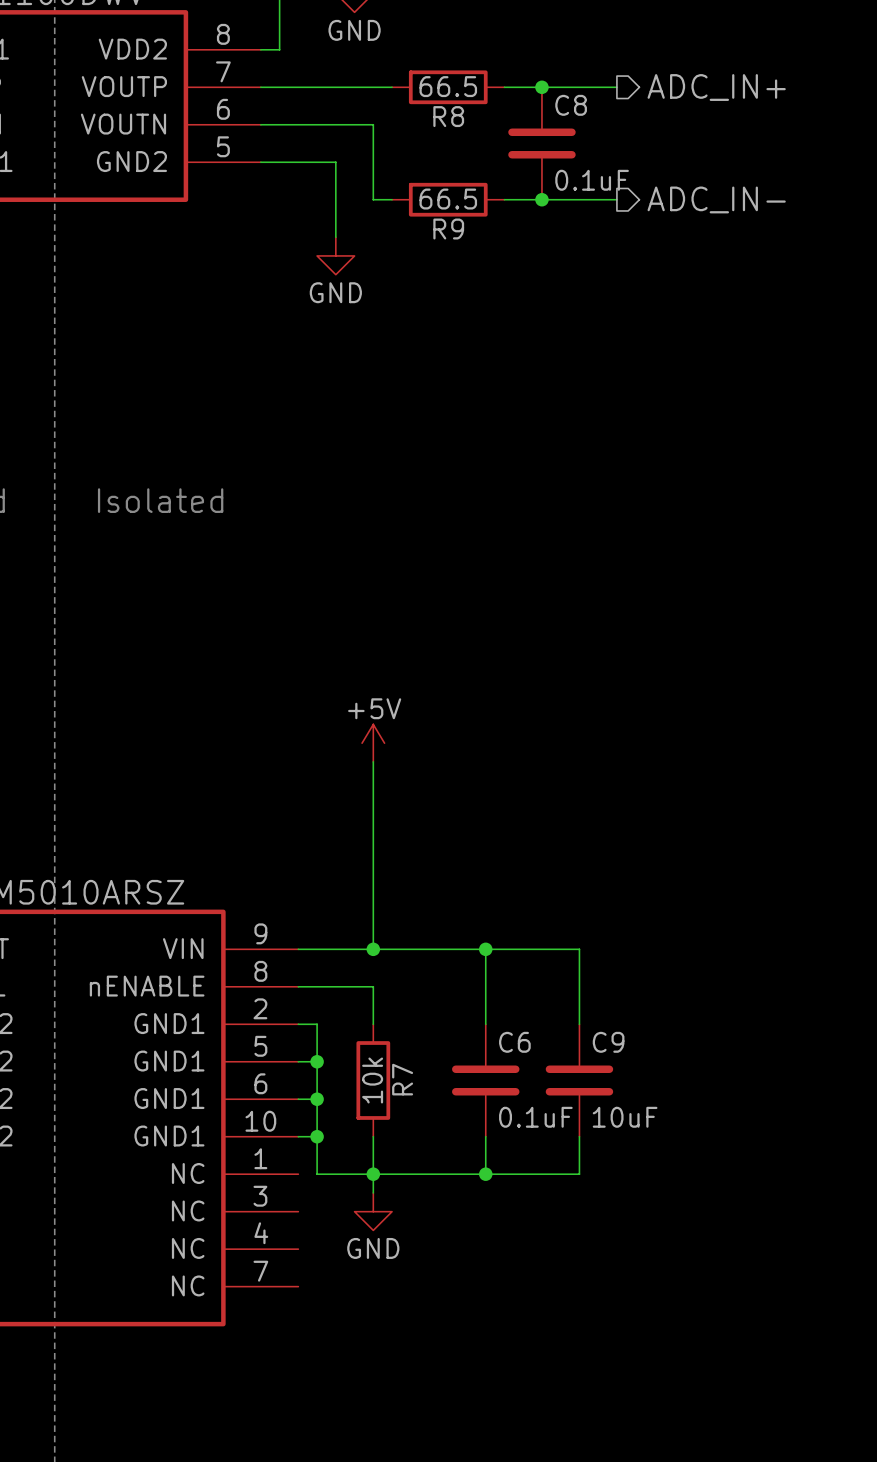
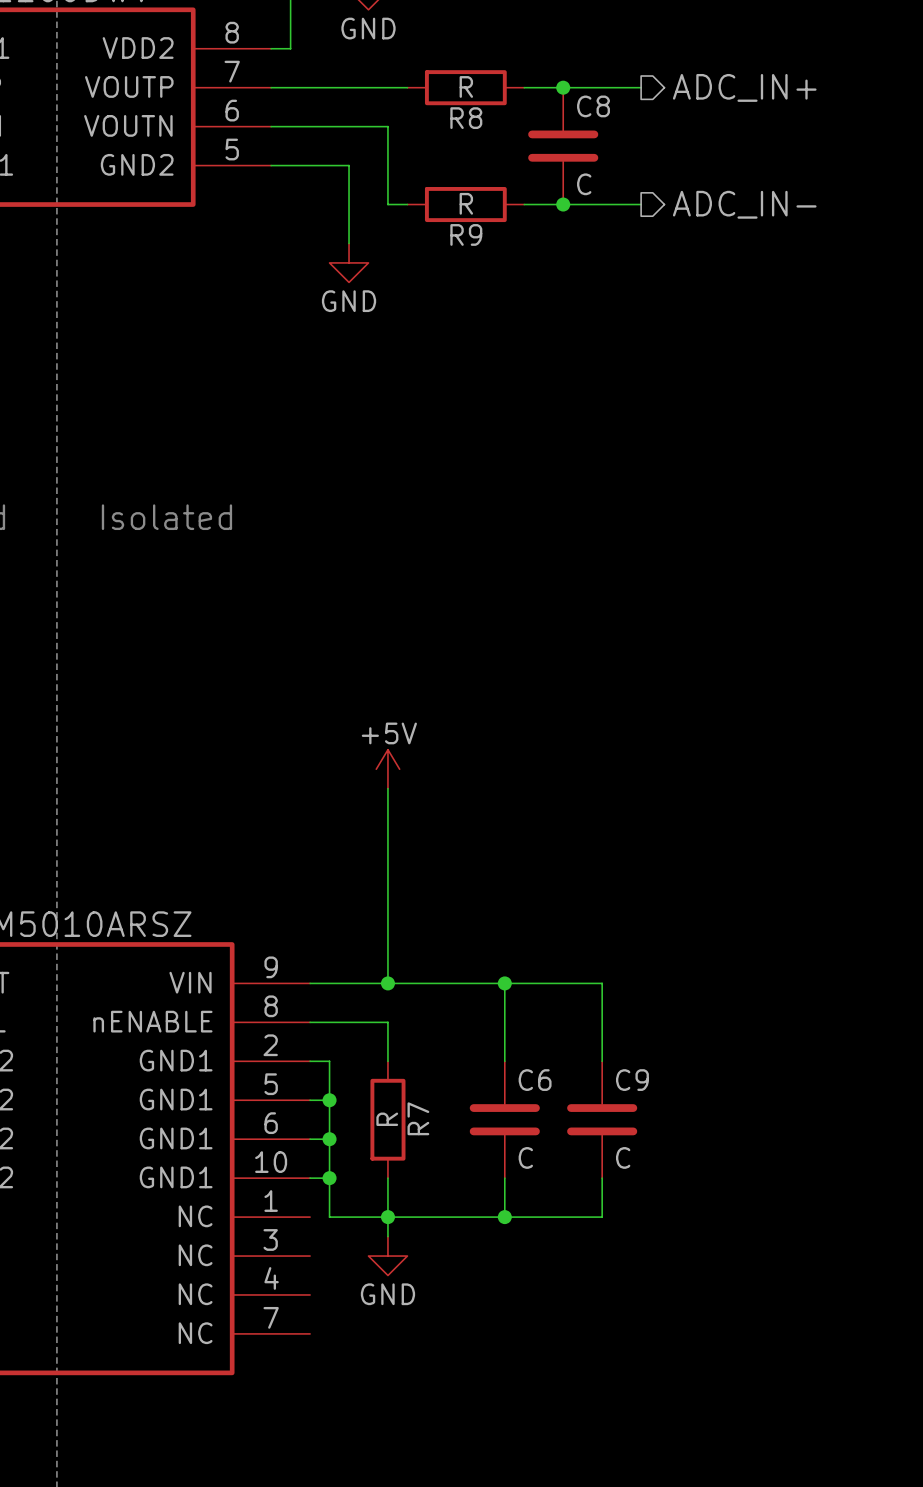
R8 value: 66.5 (448, 86) -> R (466, 86)
C8 value: 0.1uF (592, 180) -> C (584, 184)
R9 value: 66.5 (448, 199) -> R (466, 203)
R7 value: 10k (372, 1080) -> R (387, 1119)
C6 value: 0.1uF (535, 1117) -> C (525, 1157)
C9 value: 10uF (625, 1117) -> C (623, 1157)

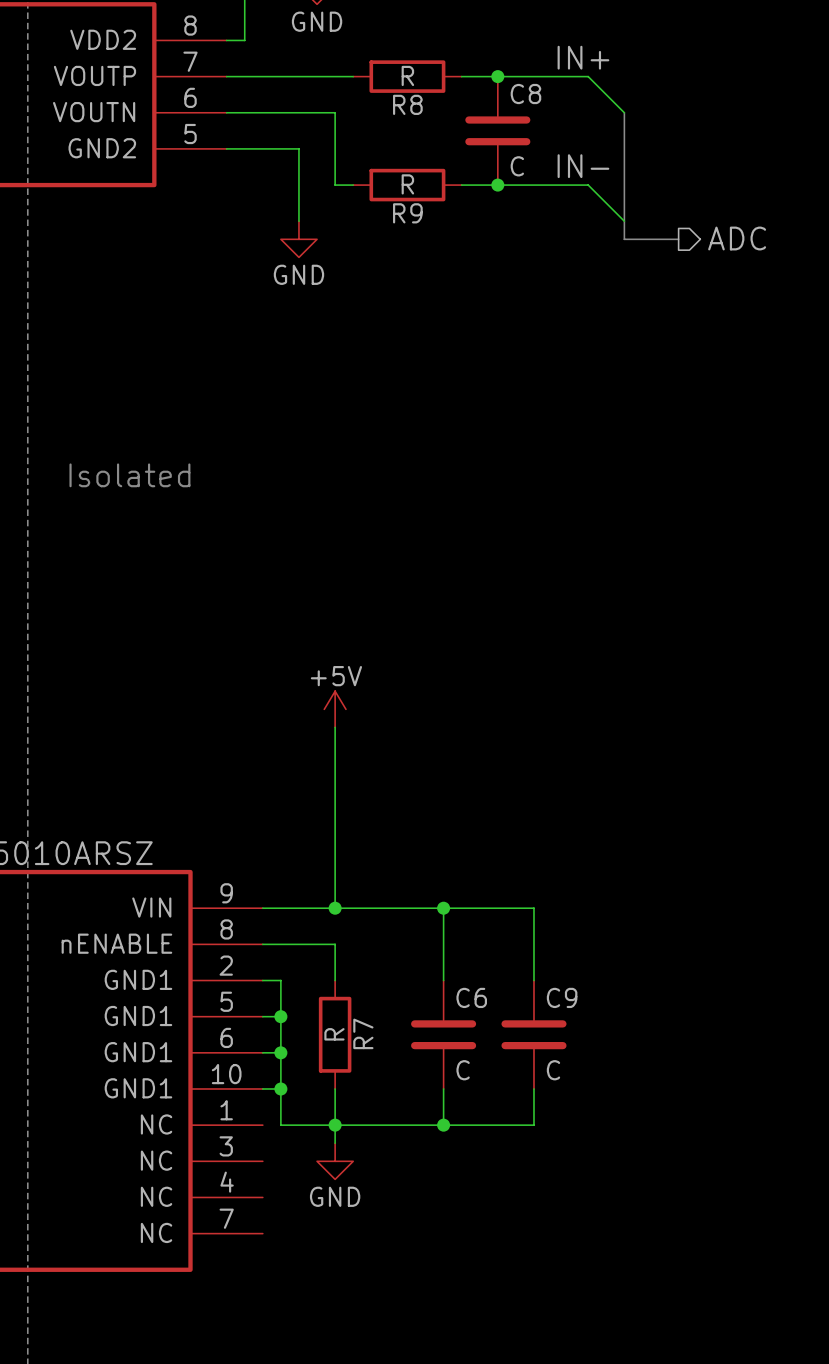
label: none -> IN+ (583, 57)
wire: none -> (570, 76) (588, 76) (624, 112)
hierarchical label: ADC_IN+ (744, 87) -> none
bus: none -> (624, 112) (624, 239) (678, 239)
label: none -> IN- (583, 166)
wire: none -> (570, 185) (588, 185) (624, 221)
hierarchical label: ADC_IN- (744, 204) -> none
hierarchical label: none -> ADC (737, 238)

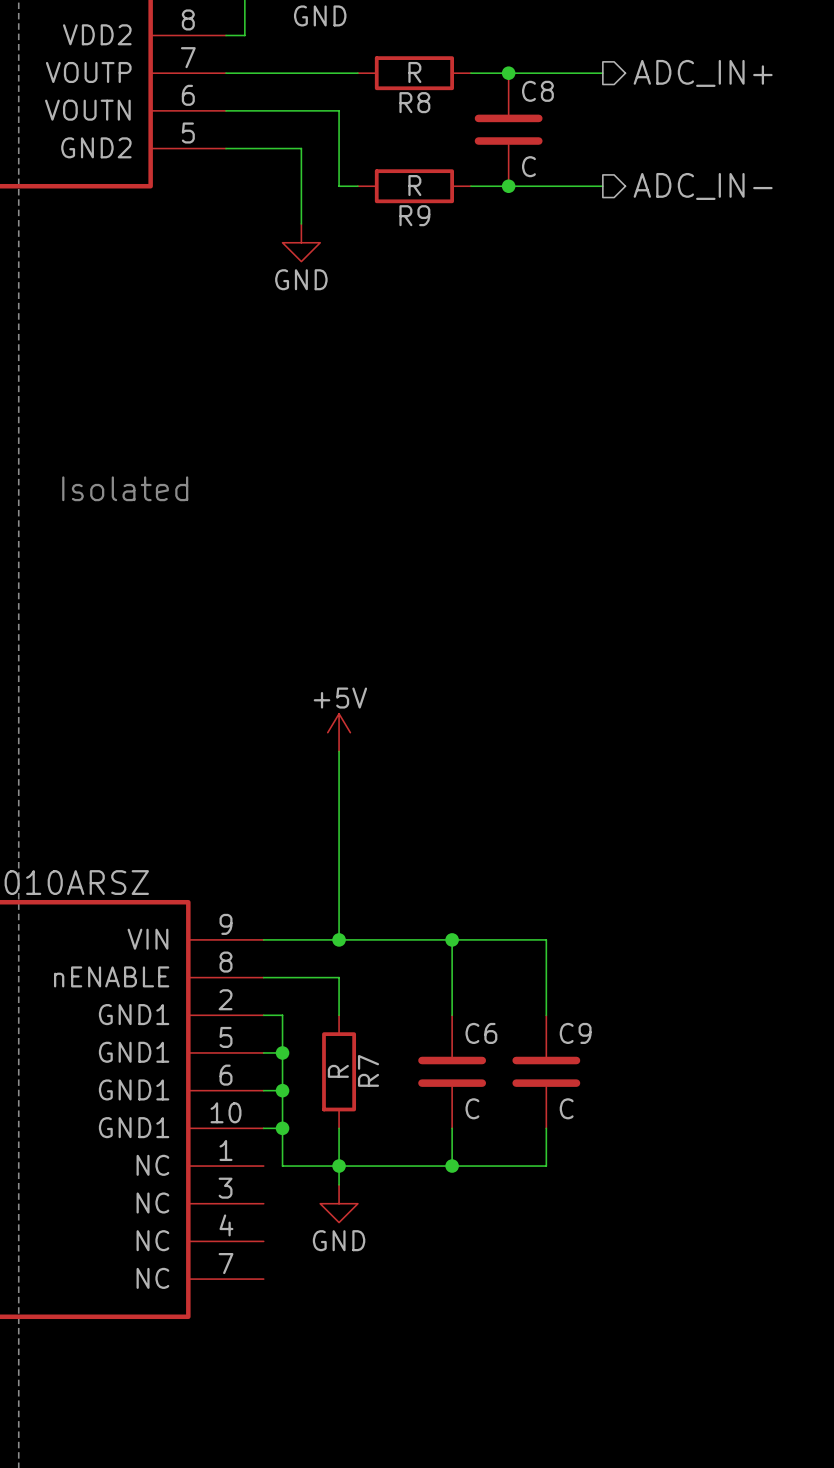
label: IN+ (583, 57) -> none
wire: (588, 76) (624, 112) -> none
hierarchical label: none -> ADC_IN+ (703, 73)
bus: (624, 112) (624, 239) (678, 239) -> none
label: IN- (583, 166) -> none
wire: (588, 185) (624, 221) -> none
hierarchical label: none -> ADC_IN- (703, 186)
hierarchical label: ADC (737, 238) -> none

